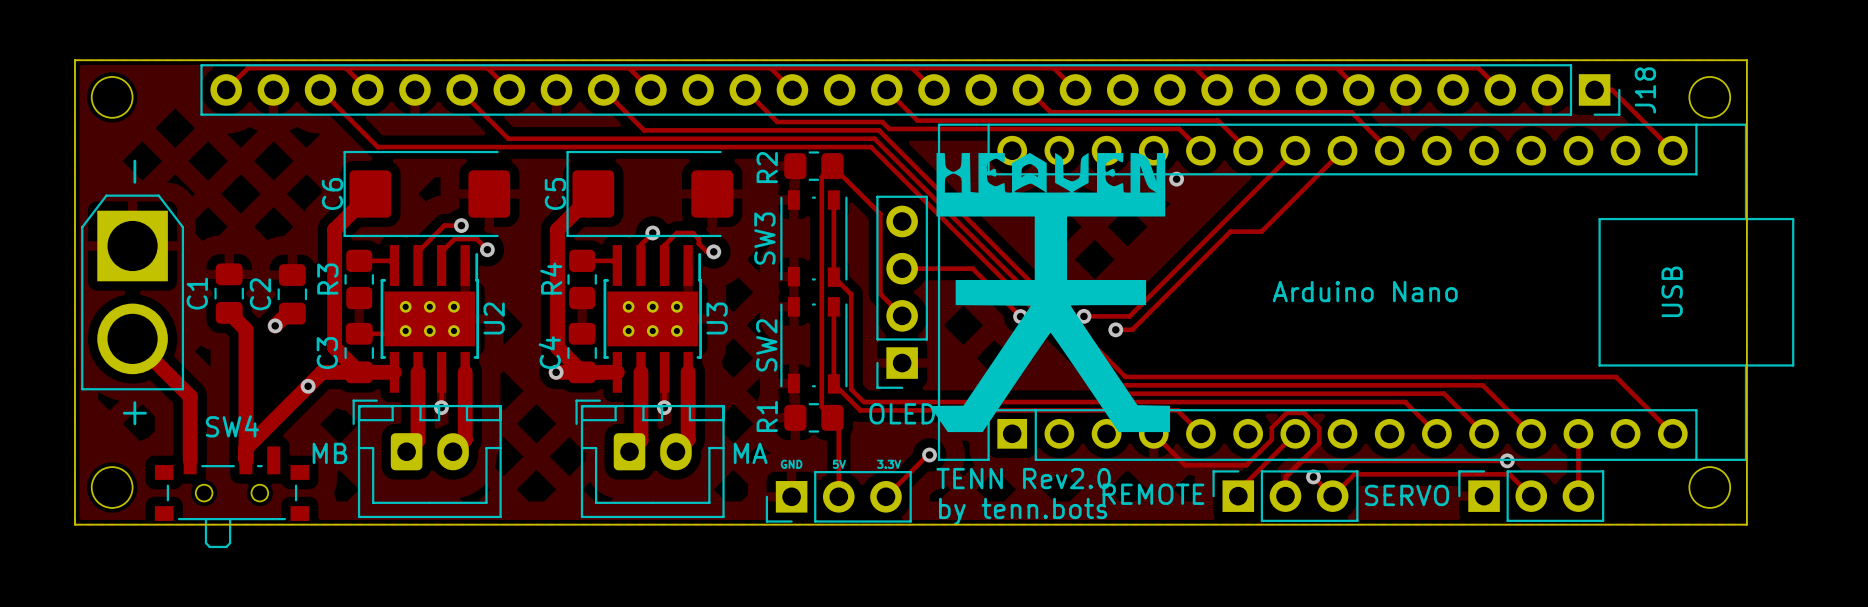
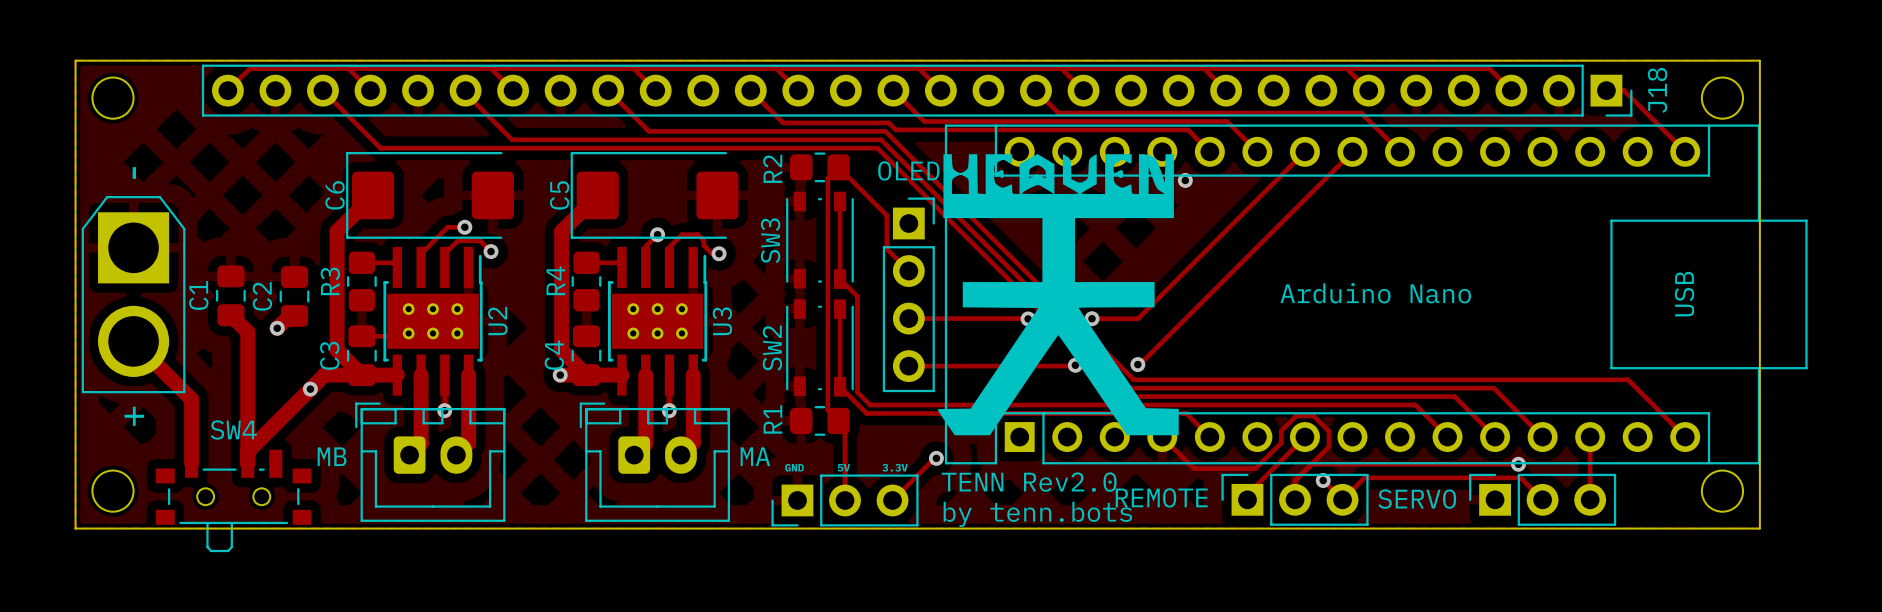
track: (1261, 231) (1230, 231) (1132, 329) (1115, 329) -> (1270, 233) (1137, 364)
track: (880, 247) (880, 294) (902, 315) -> (886, 249) (908, 271)
track: (902, 268) (972, 268) (1020, 316) -> (908, 318) (1027, 318)
OLED rotation: 0° (902, 292) -> 180° (908, 294)
via: (1115, 329) -> none
via: none -> (1137, 364)
track: none -> (1075, 365) (908, 366)
via: none -> (1075, 365)

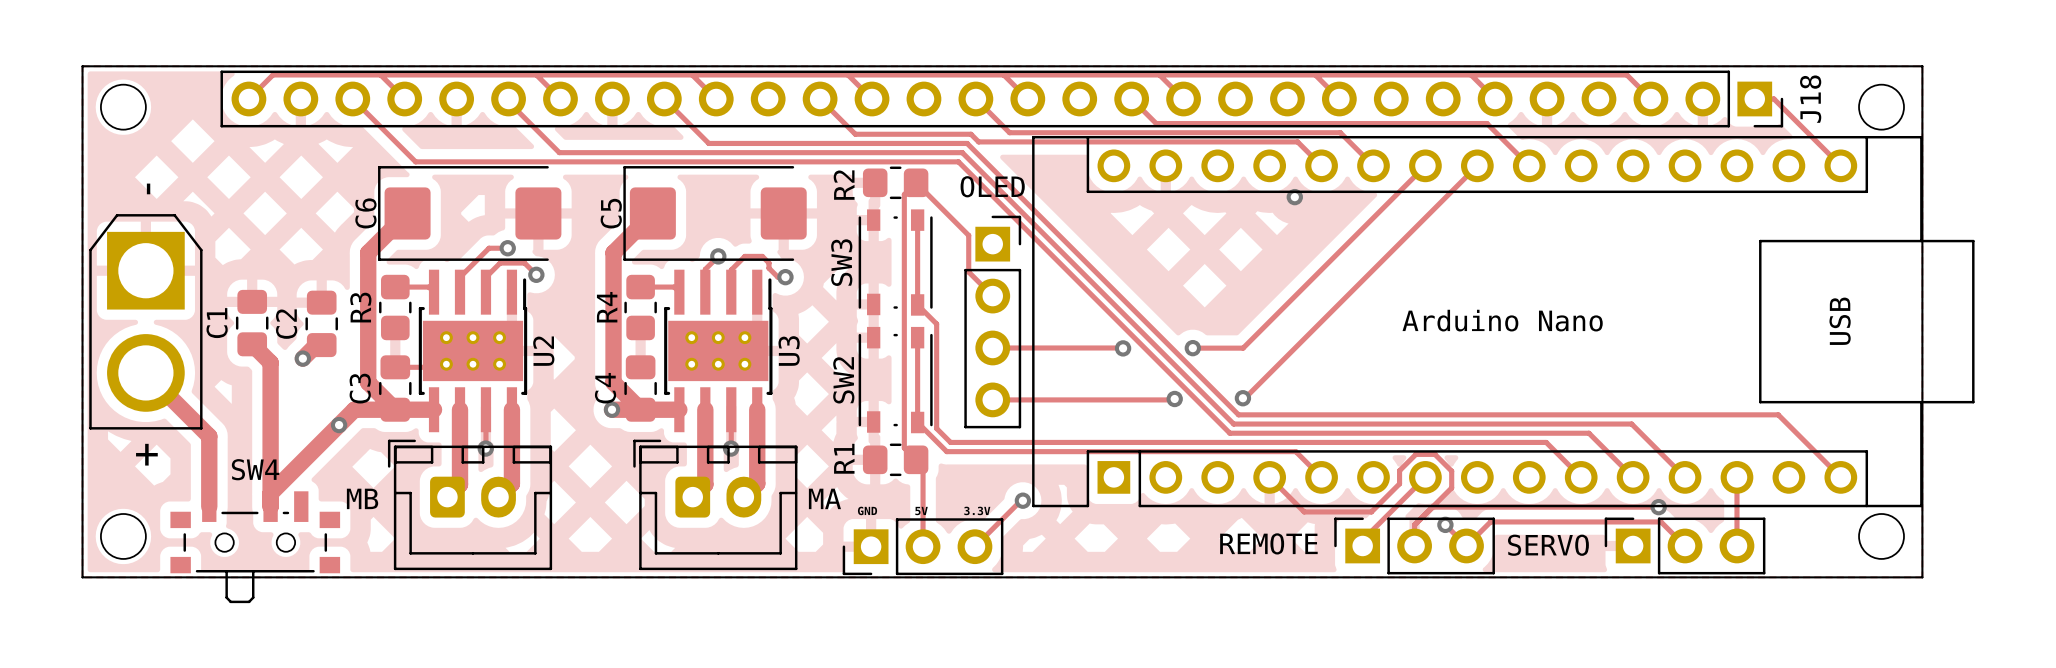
drawing: [937, 153, 1179, 436] -> none
text: TENN Rev2.0 (1029, 482) -> none
text: by tenn.bots (1037, 514) -> none

